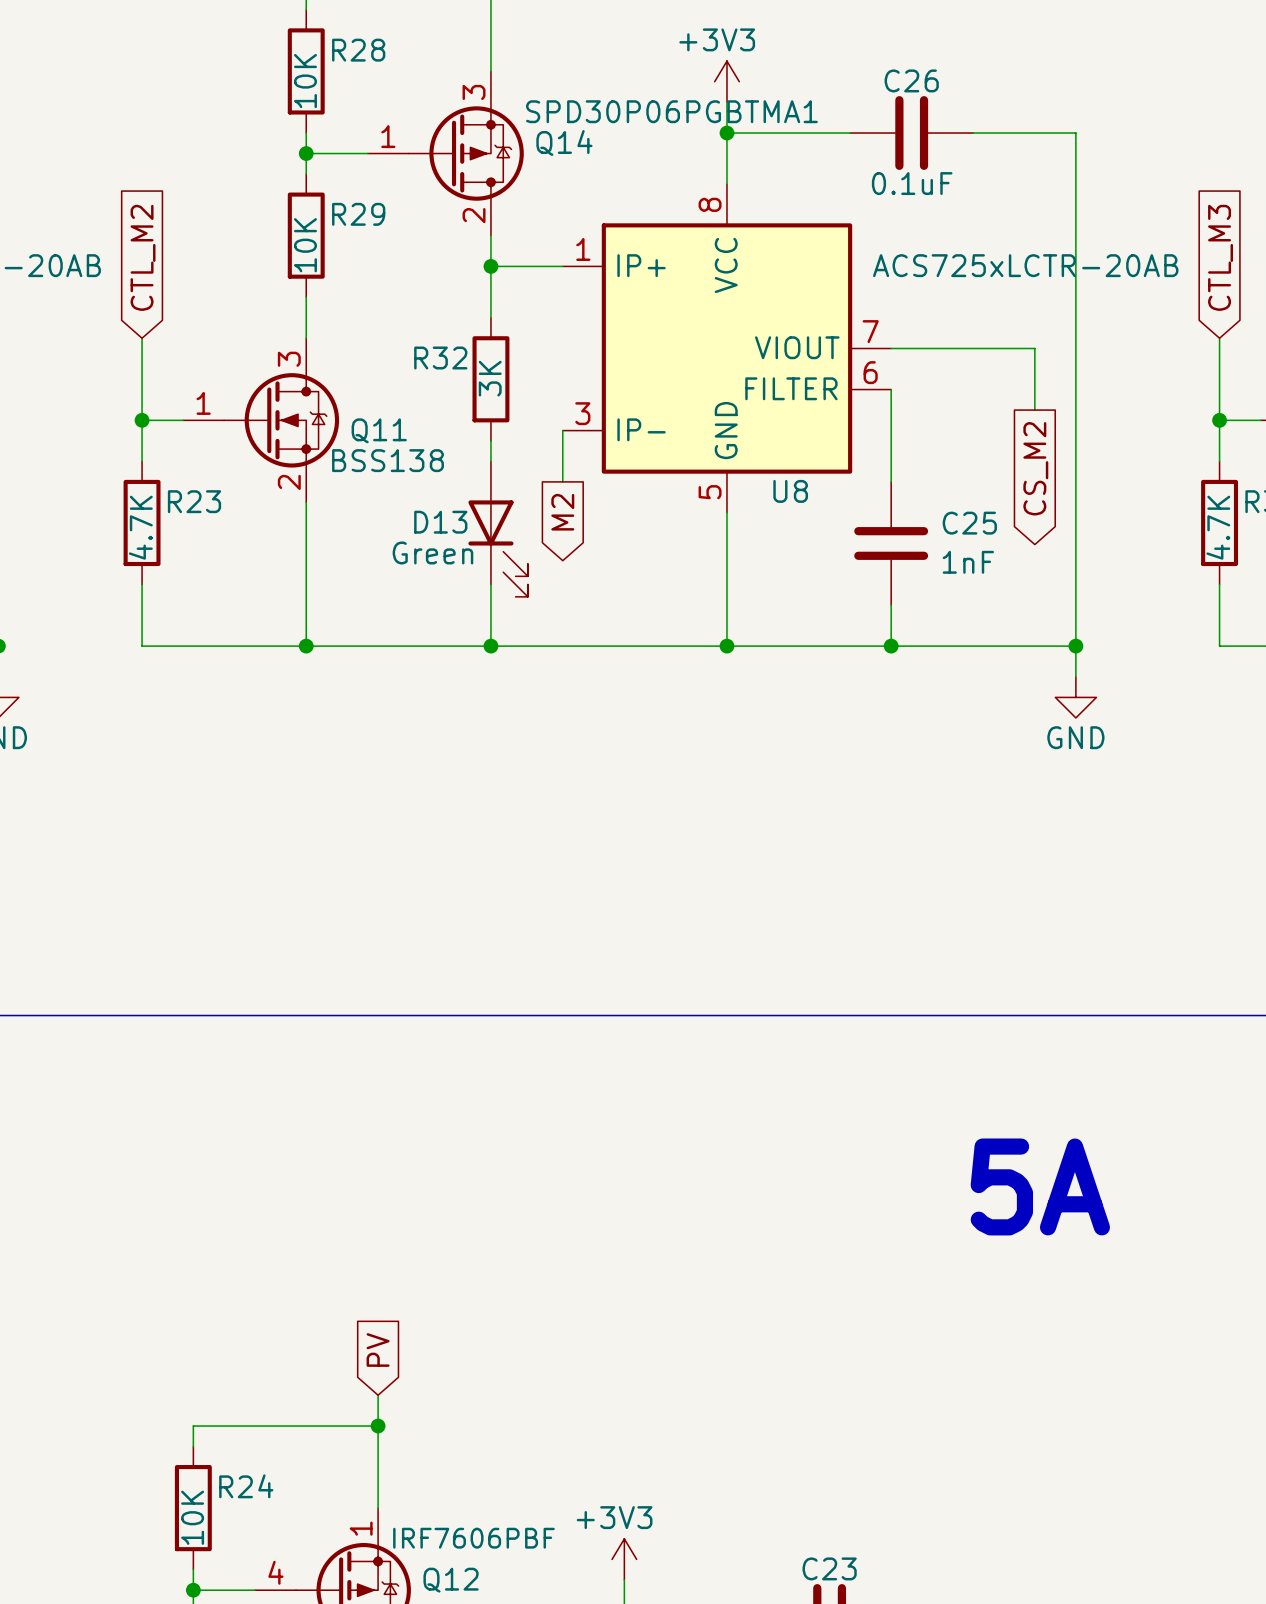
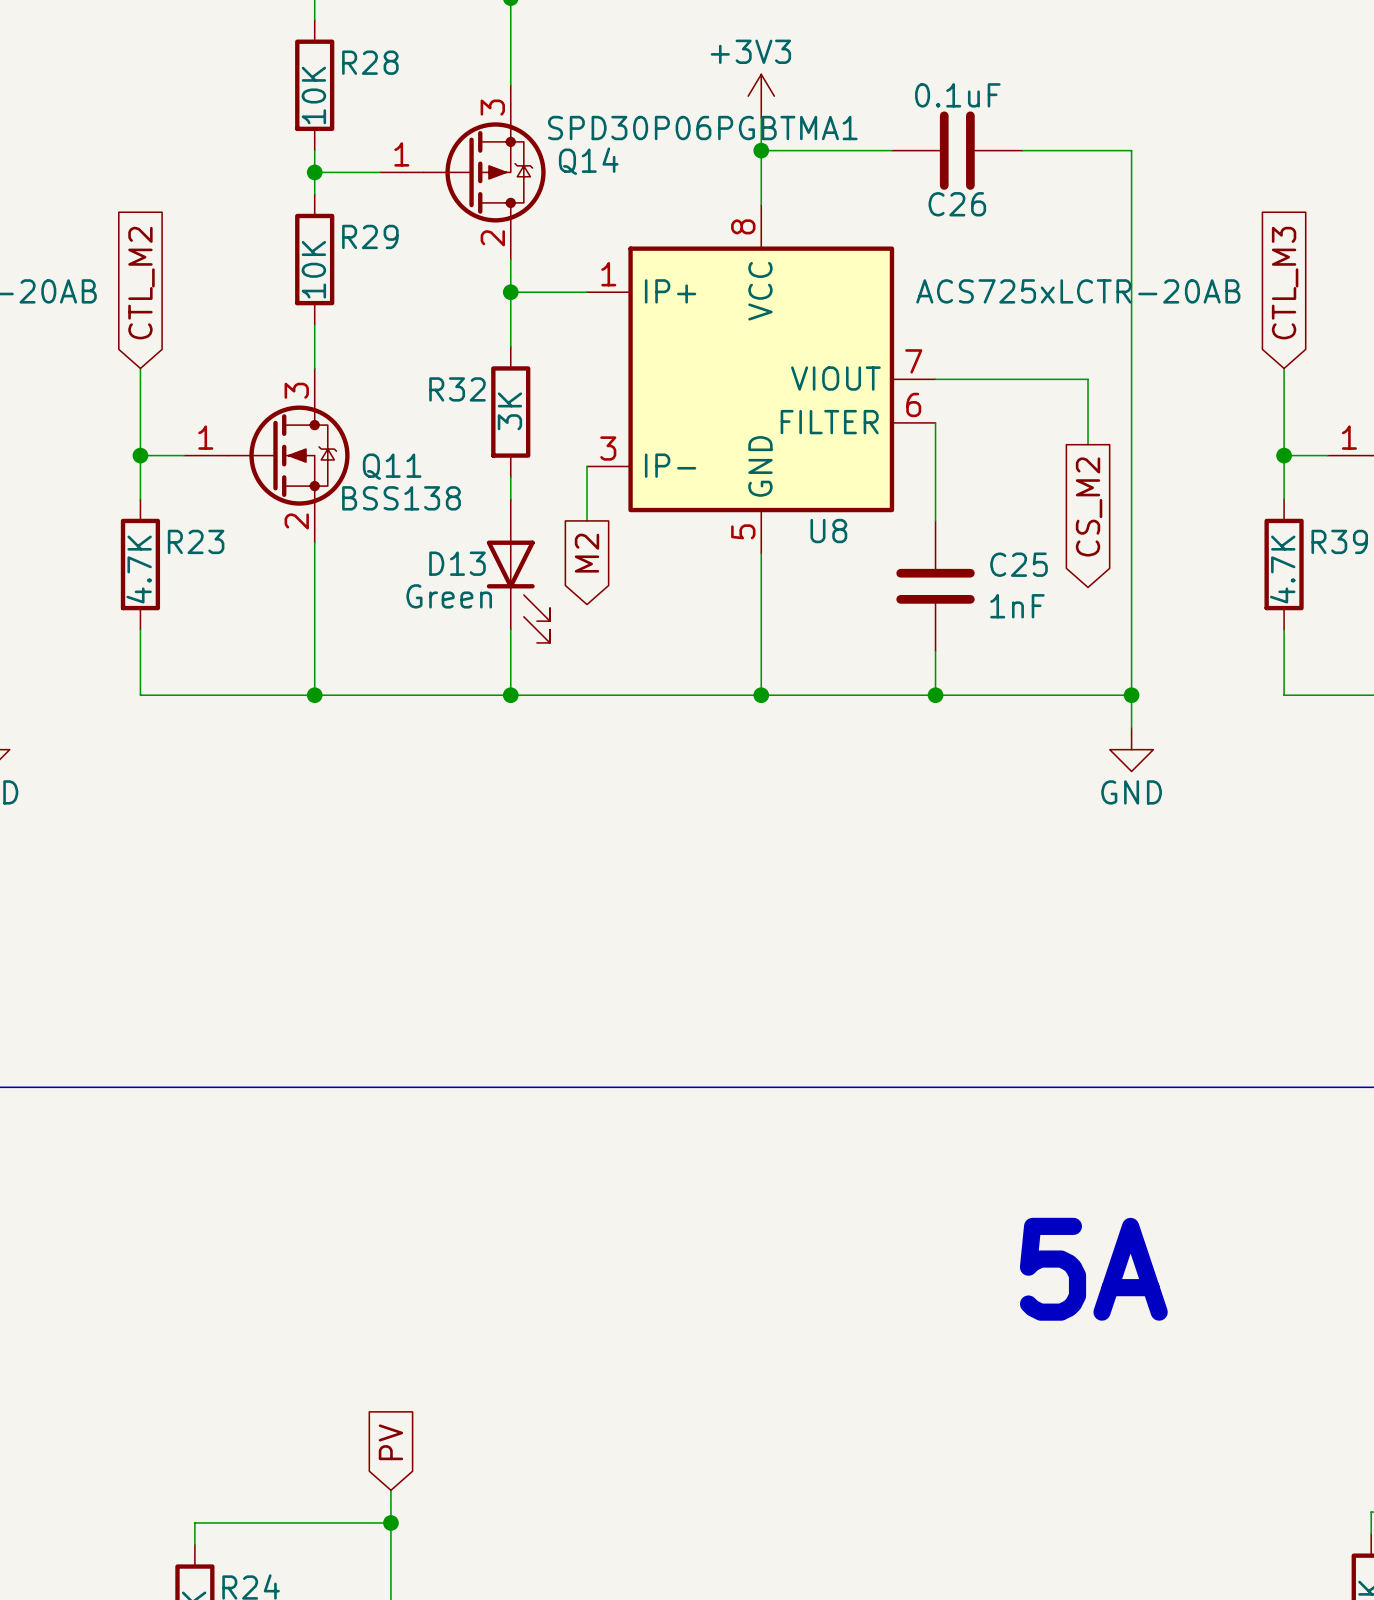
C26 name position: C26 (911, 80) -> C26 (957, 204)
C26 value position: 0.1uF (912, 183) -> 0.1uF (957, 95)

